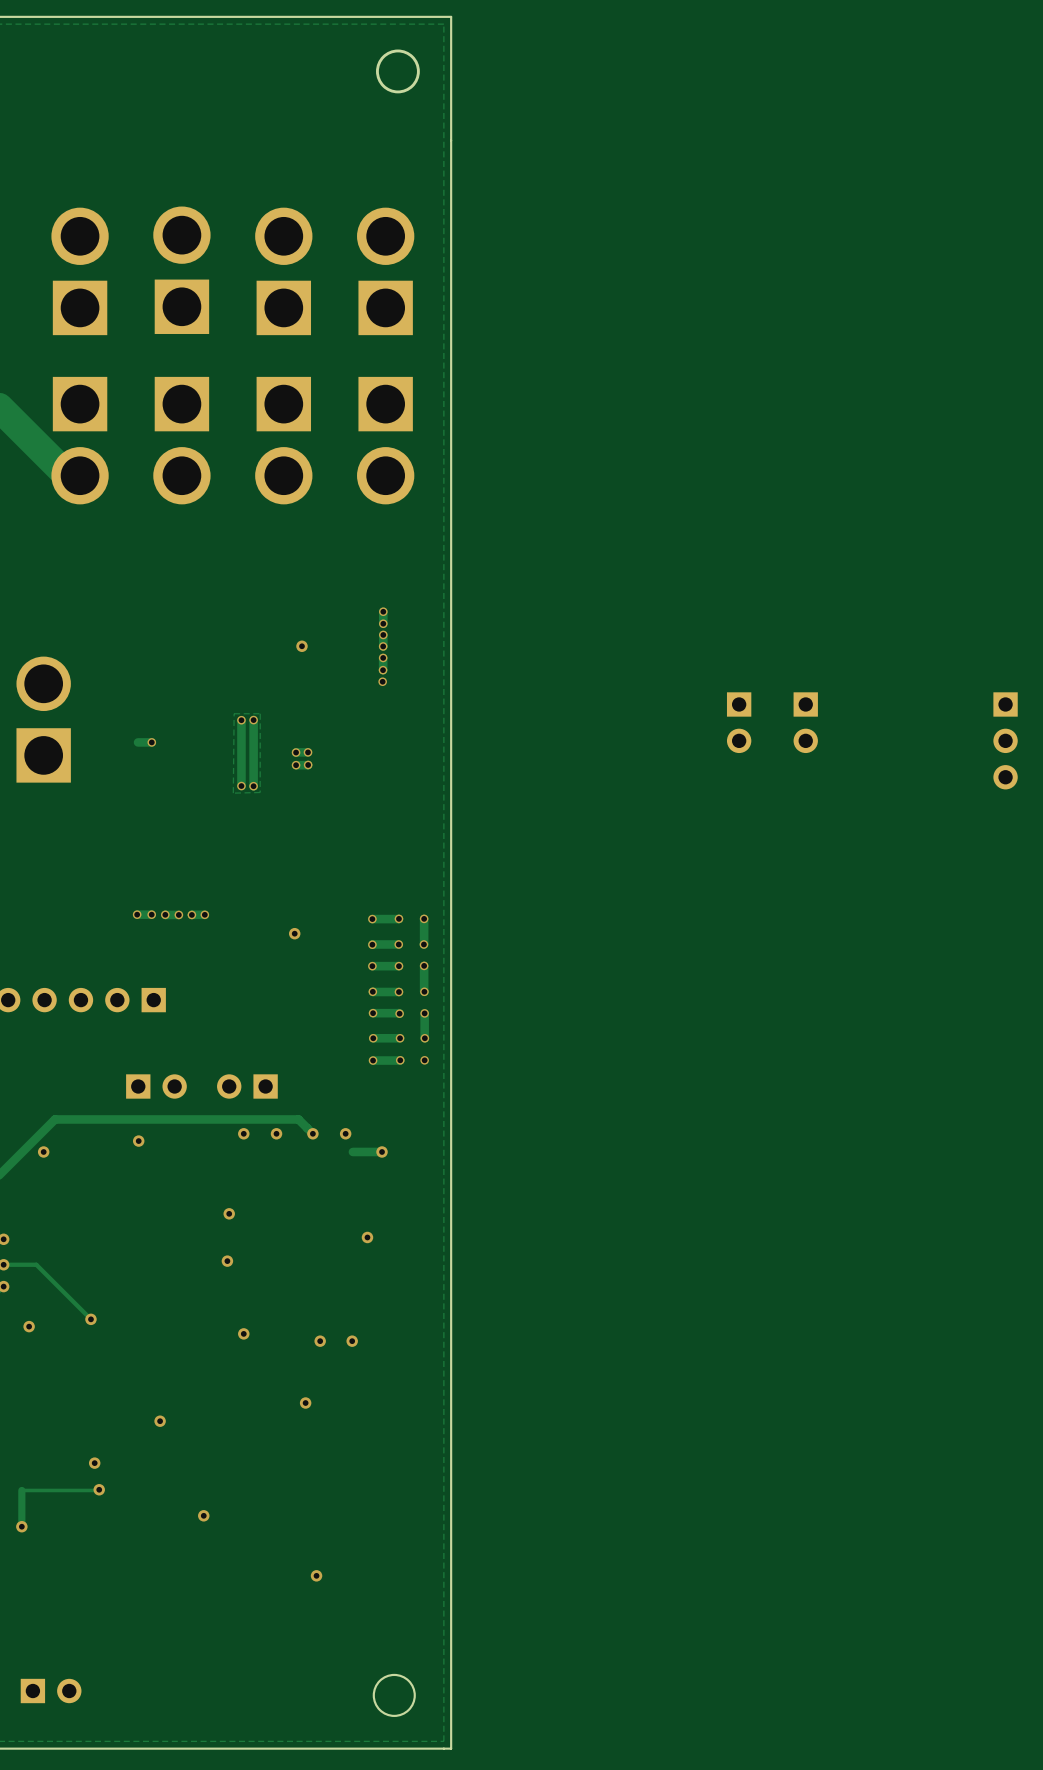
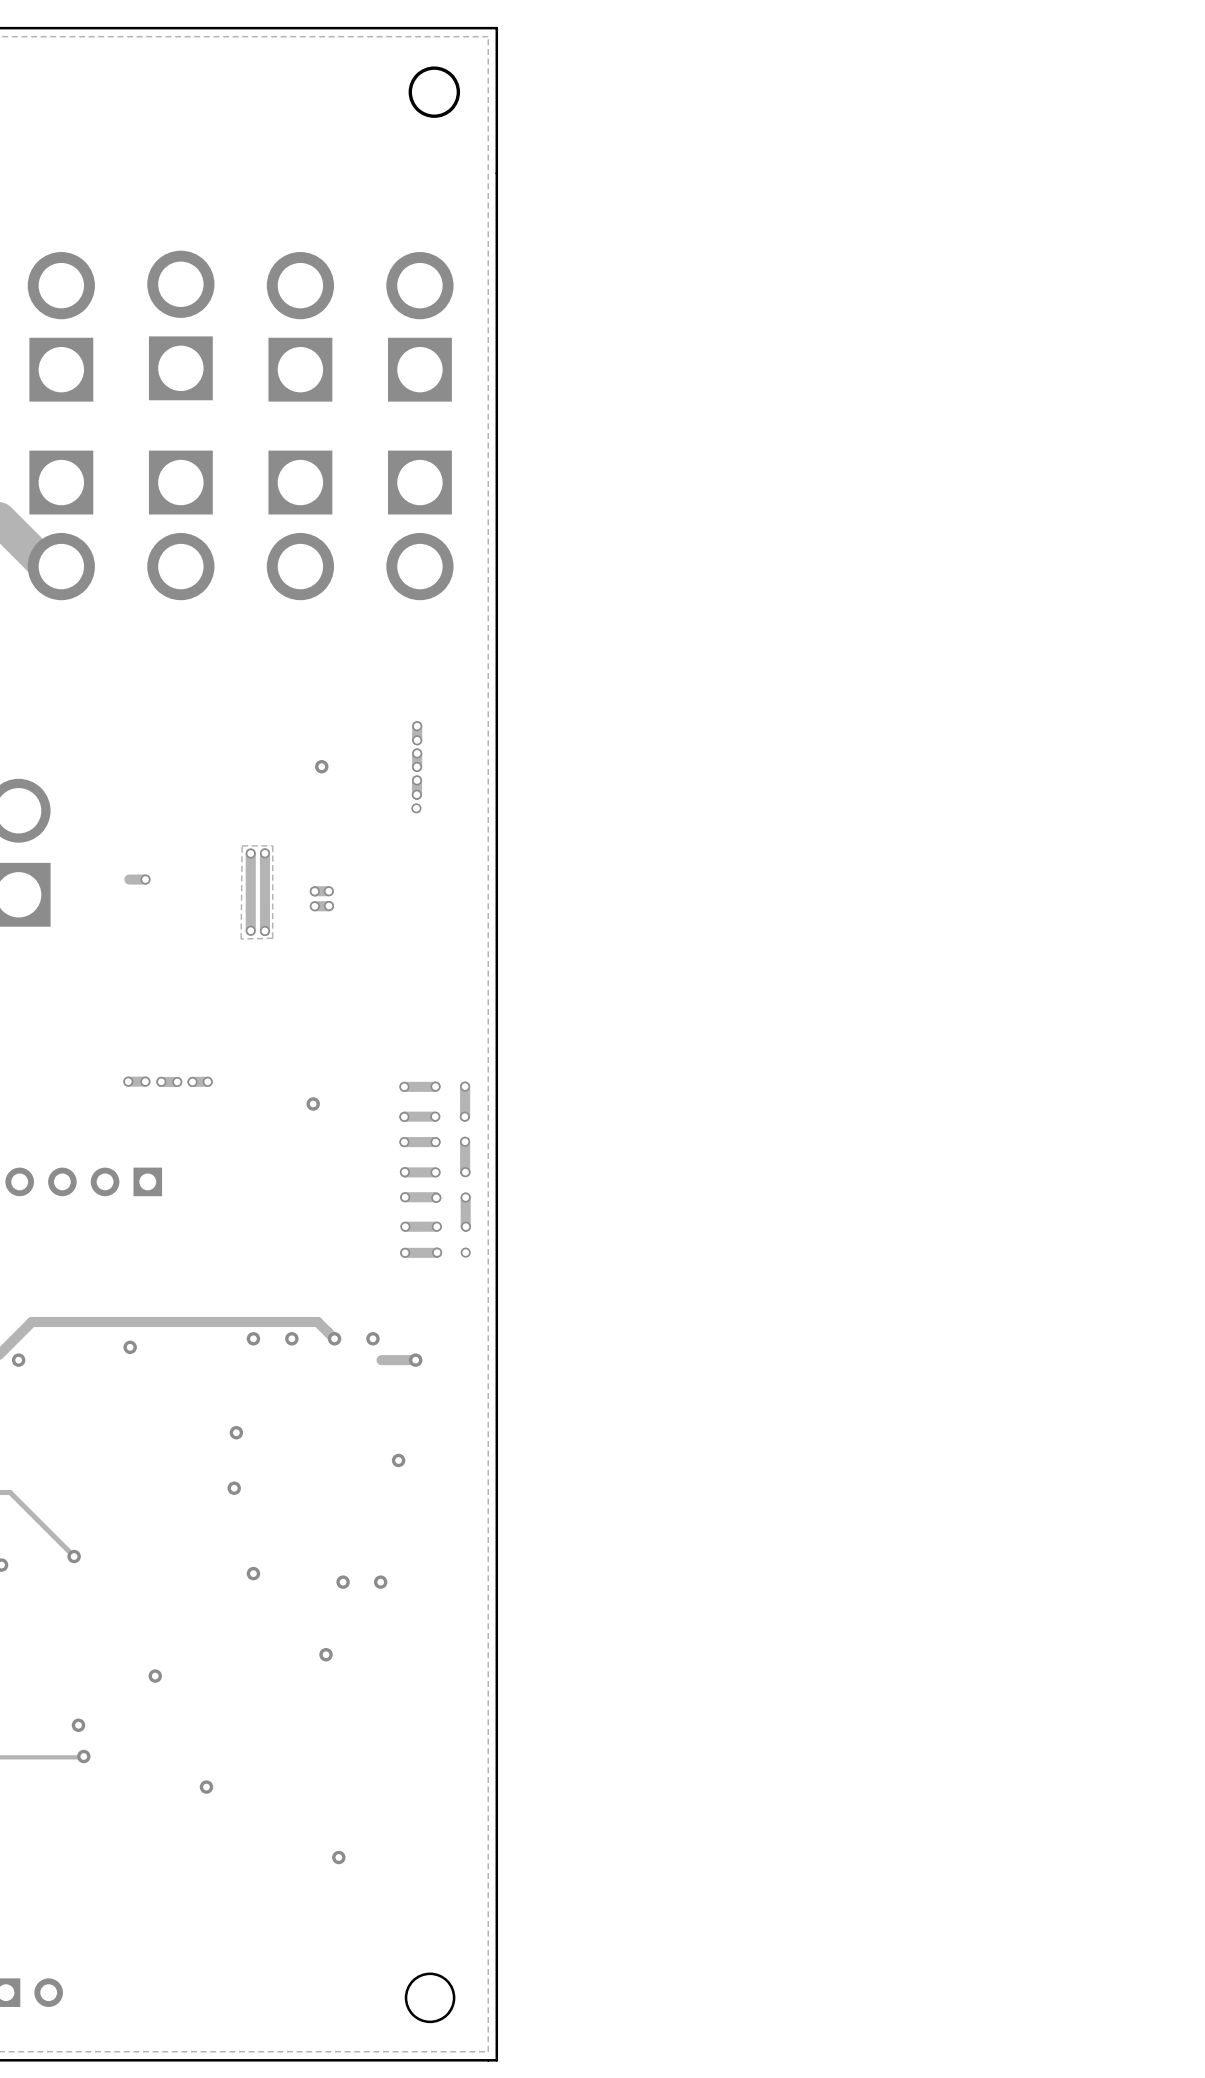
part: (739, 722) -> none
part: (805, 722) -> none
part: (1005, 740) -> none
part: (156, 1086) -> none
part: (247, 1086) -> none

